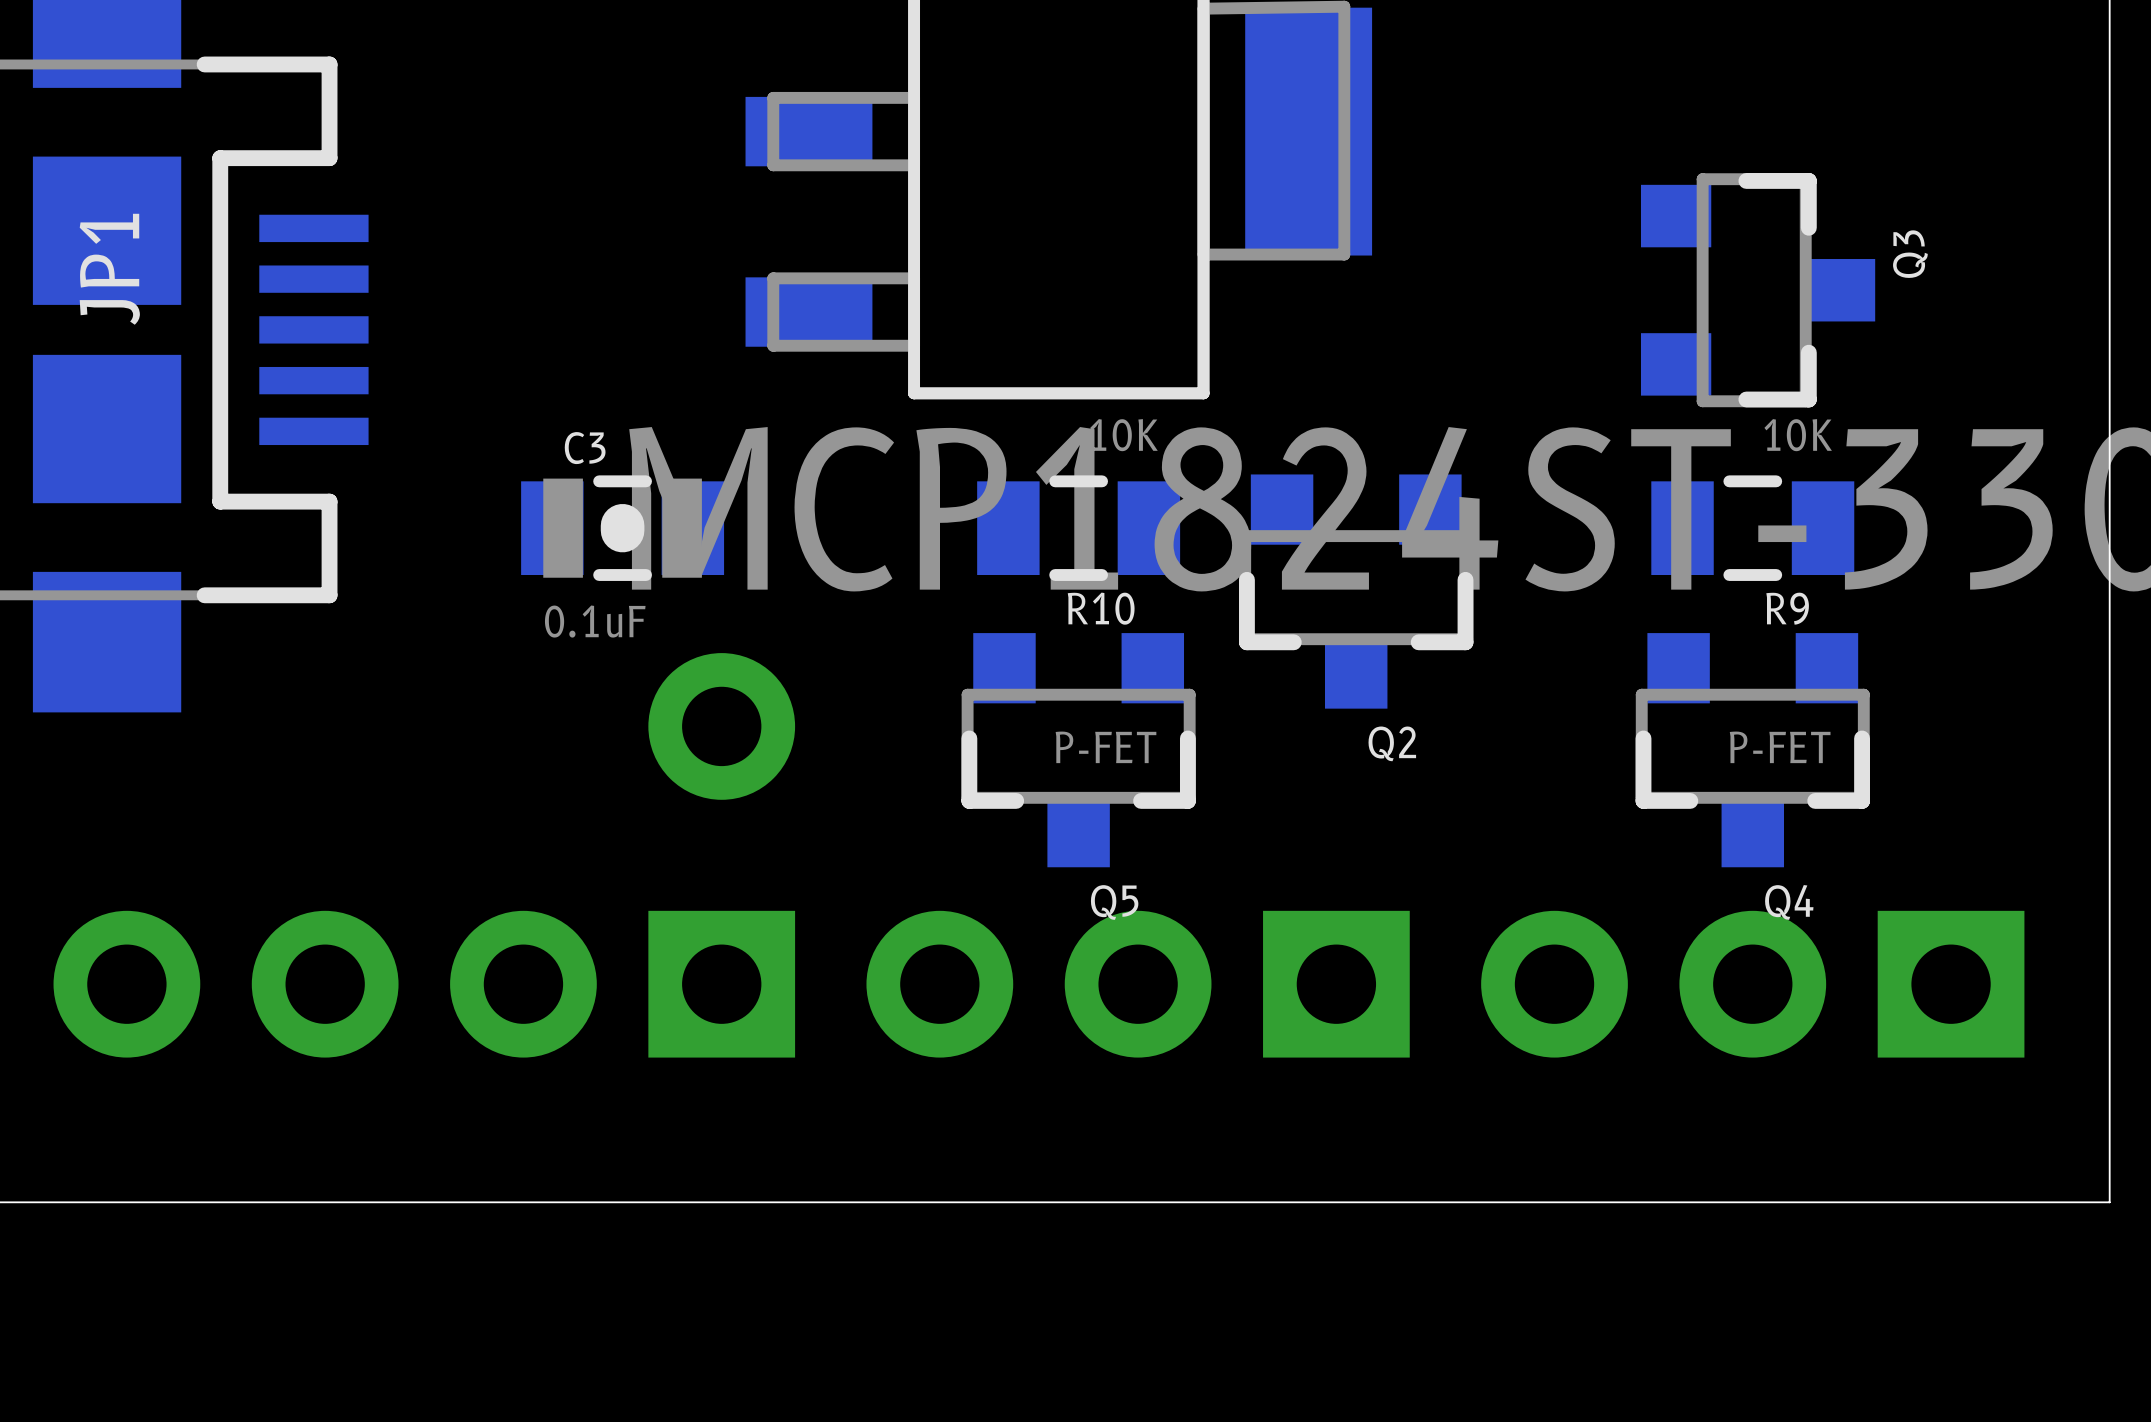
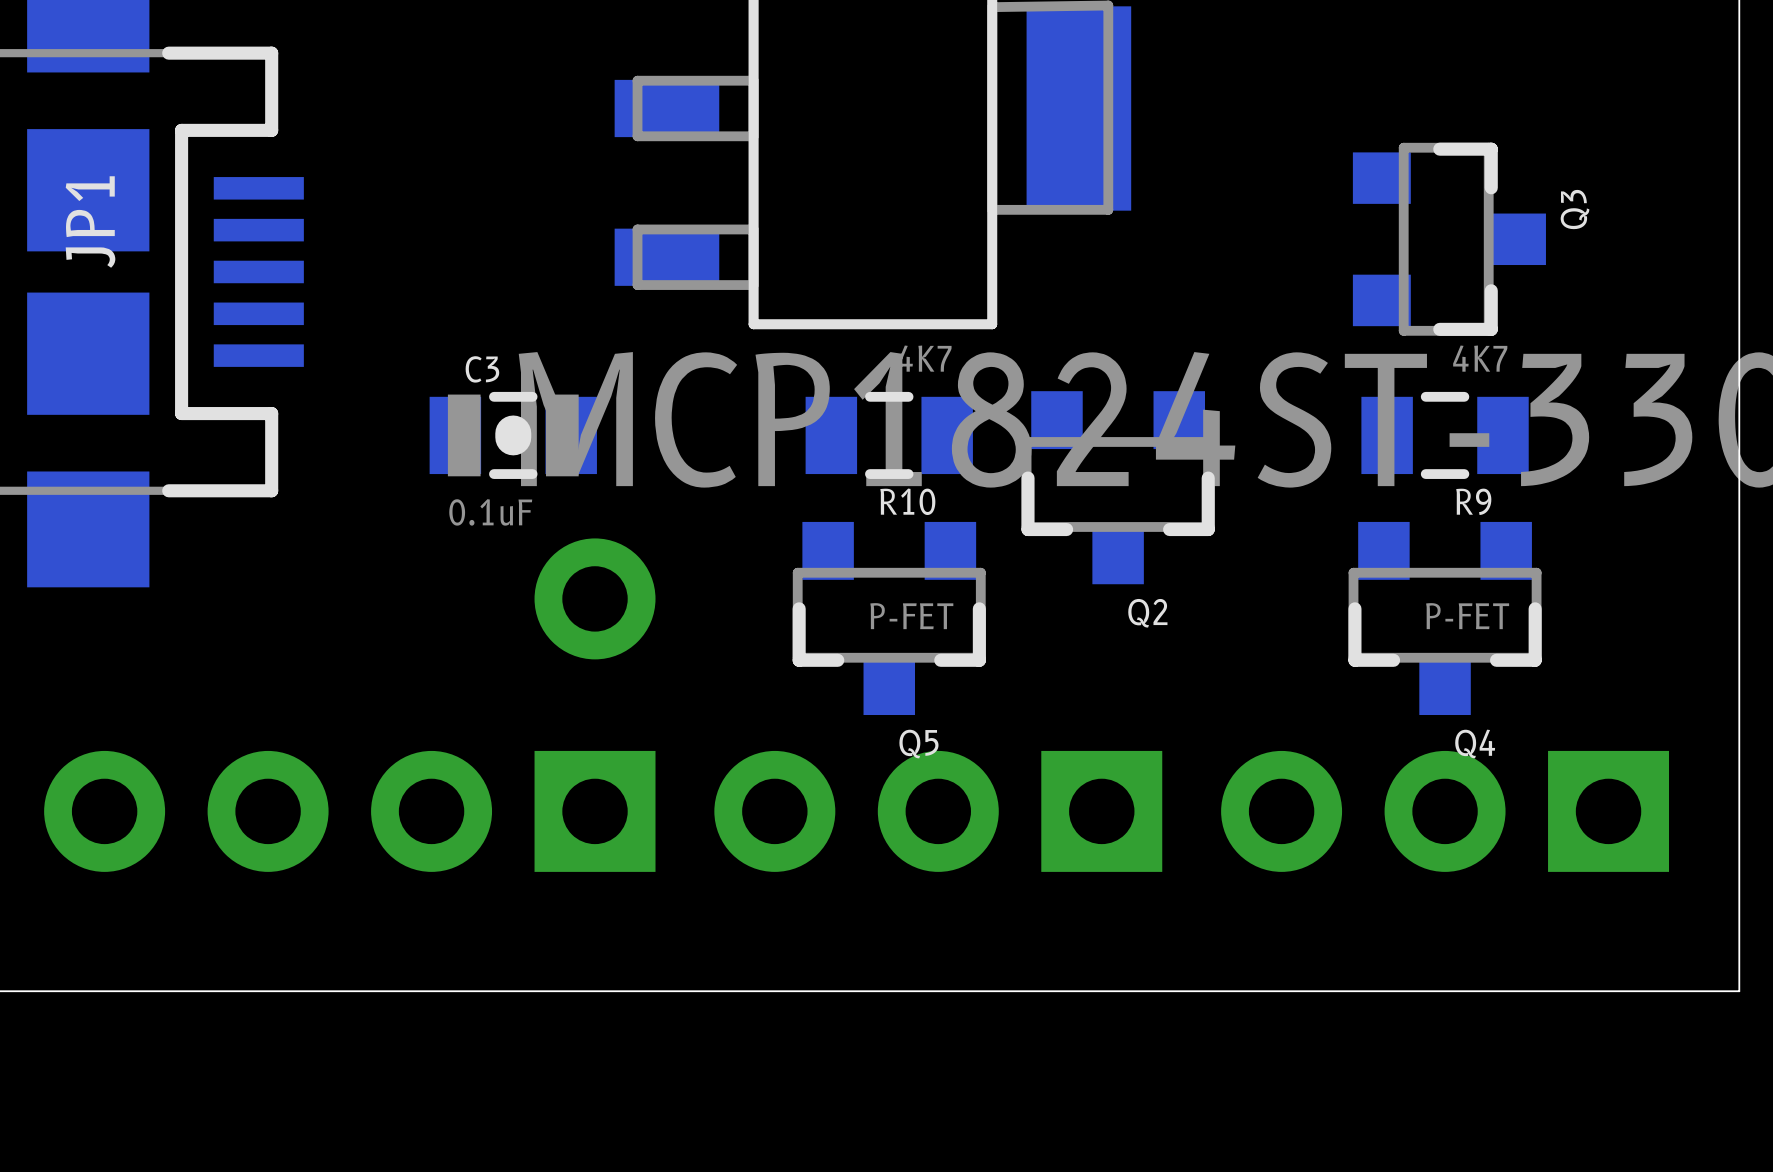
R10 value: 10K (1124, 435) -> 4K7 (924, 358)
R9 value: 10K (1798, 435) -> 4K7 (1480, 358)

